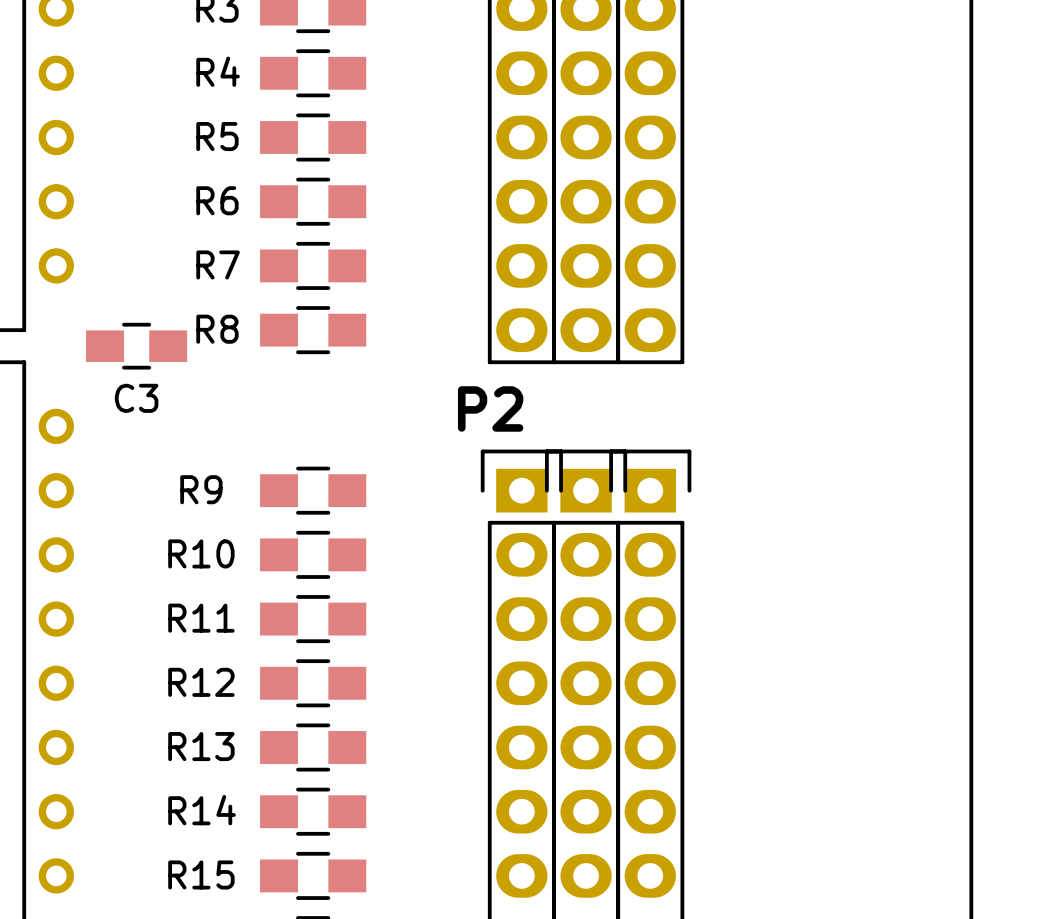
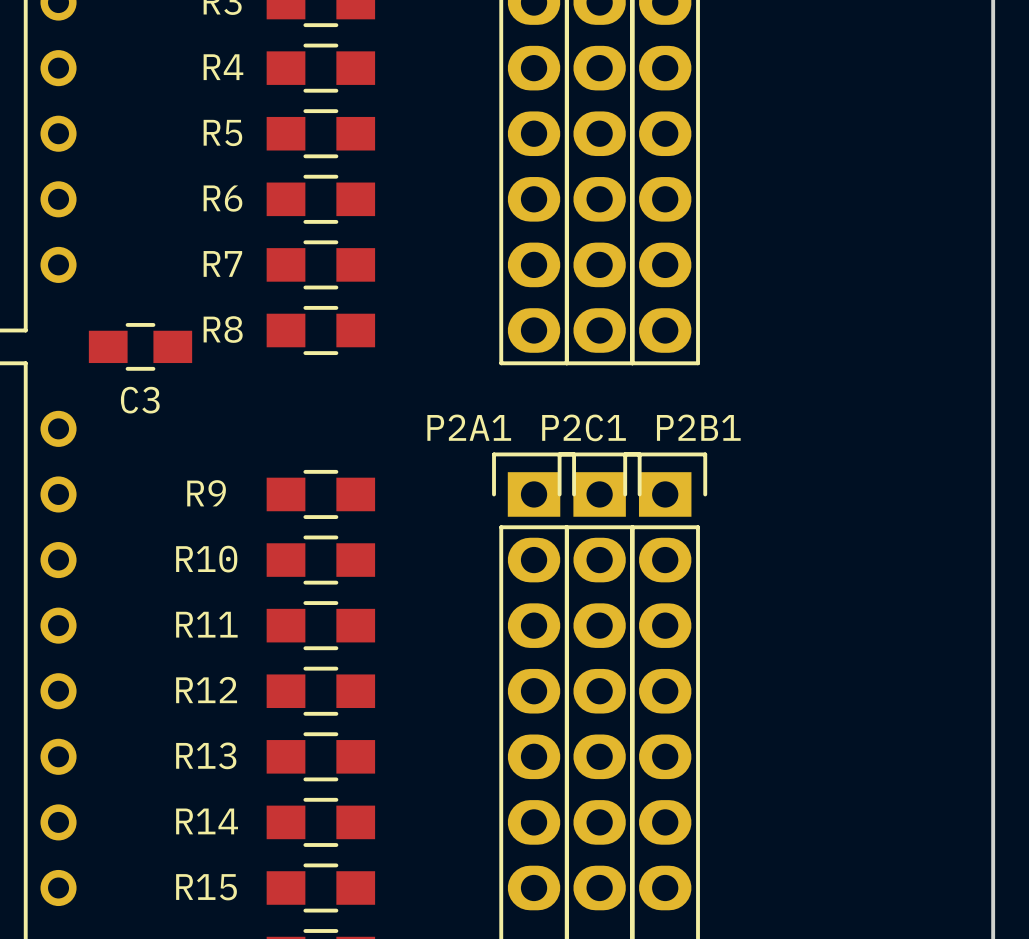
text: P2 (490, 408) -> none
P2A1 name: none -> P2A1 (469, 427)
P2C1 name: none -> P2C1 (584, 427)
P2B1 name: none -> P2B1 (698, 427)

